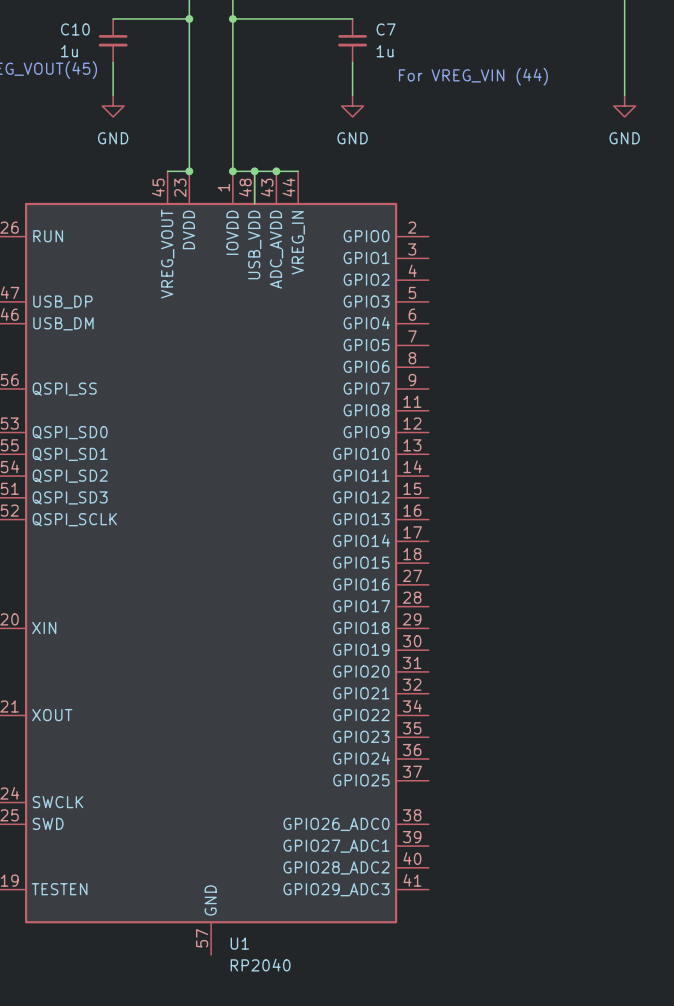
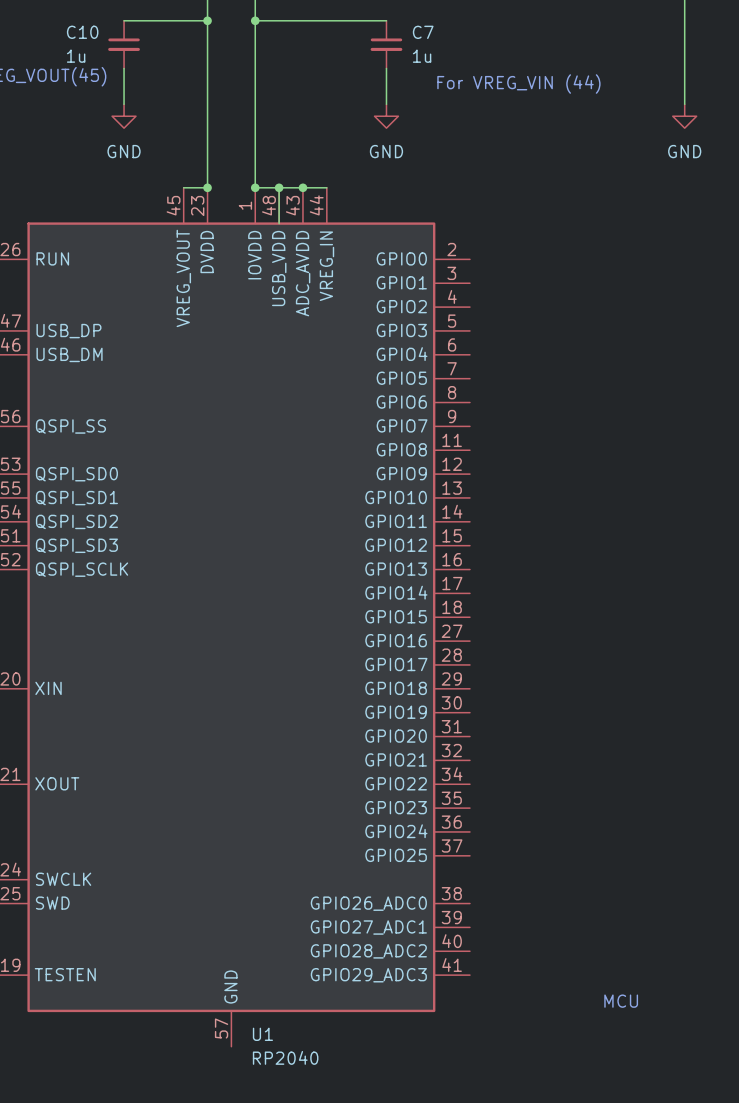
text: none -> MCU (621, 1001)

